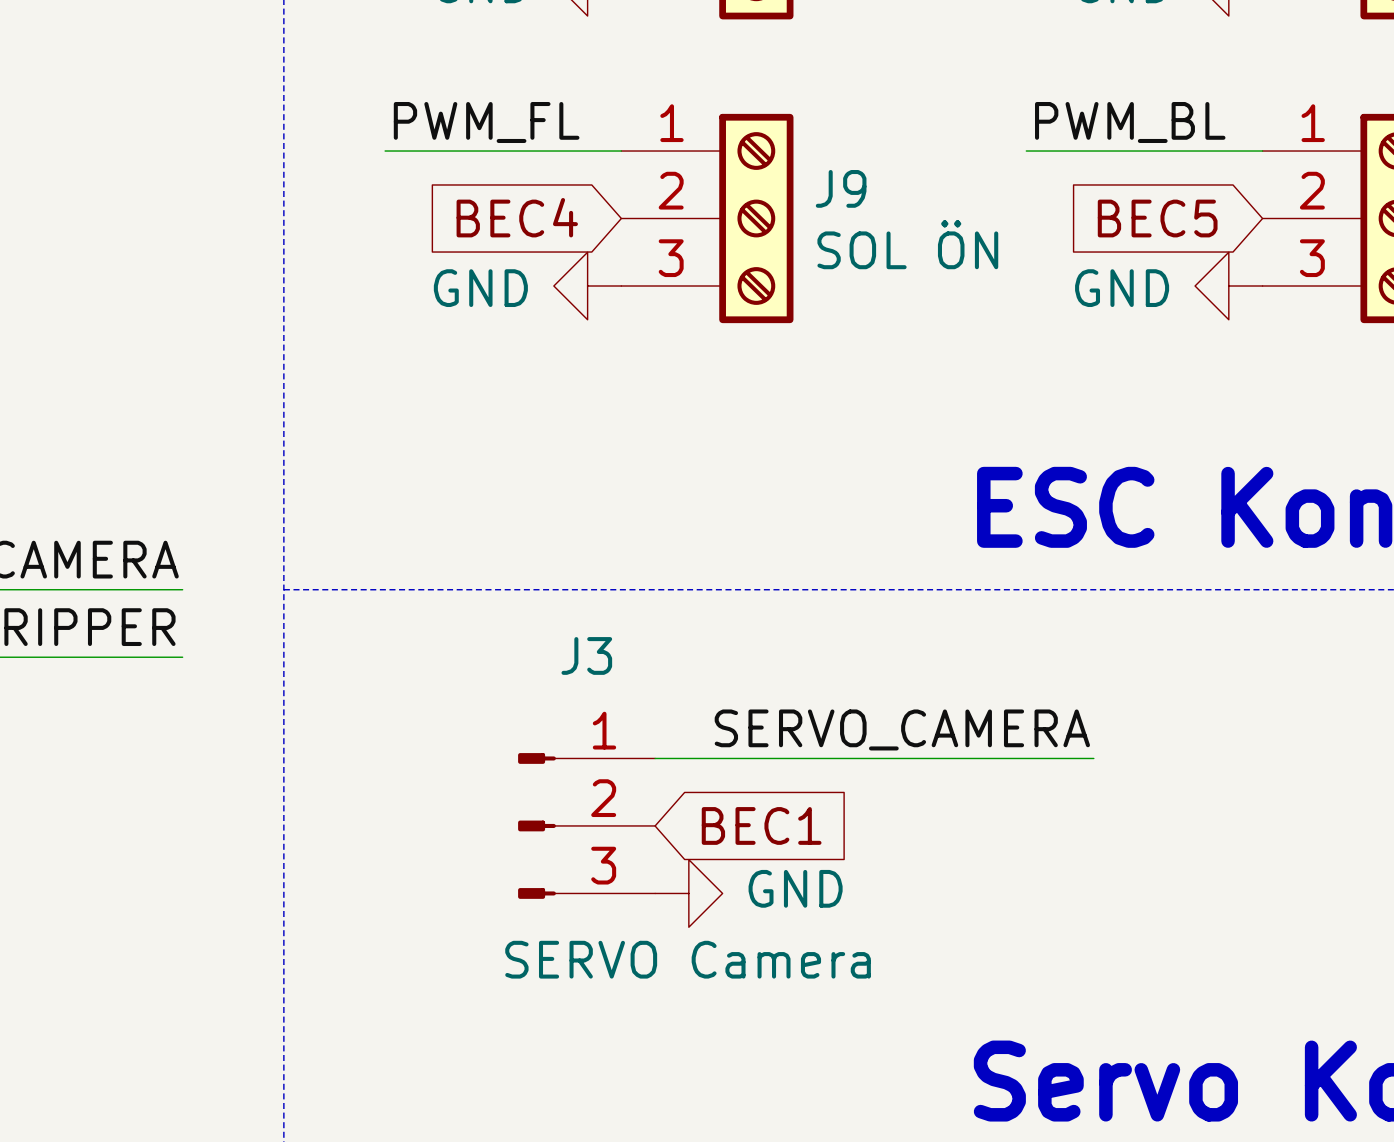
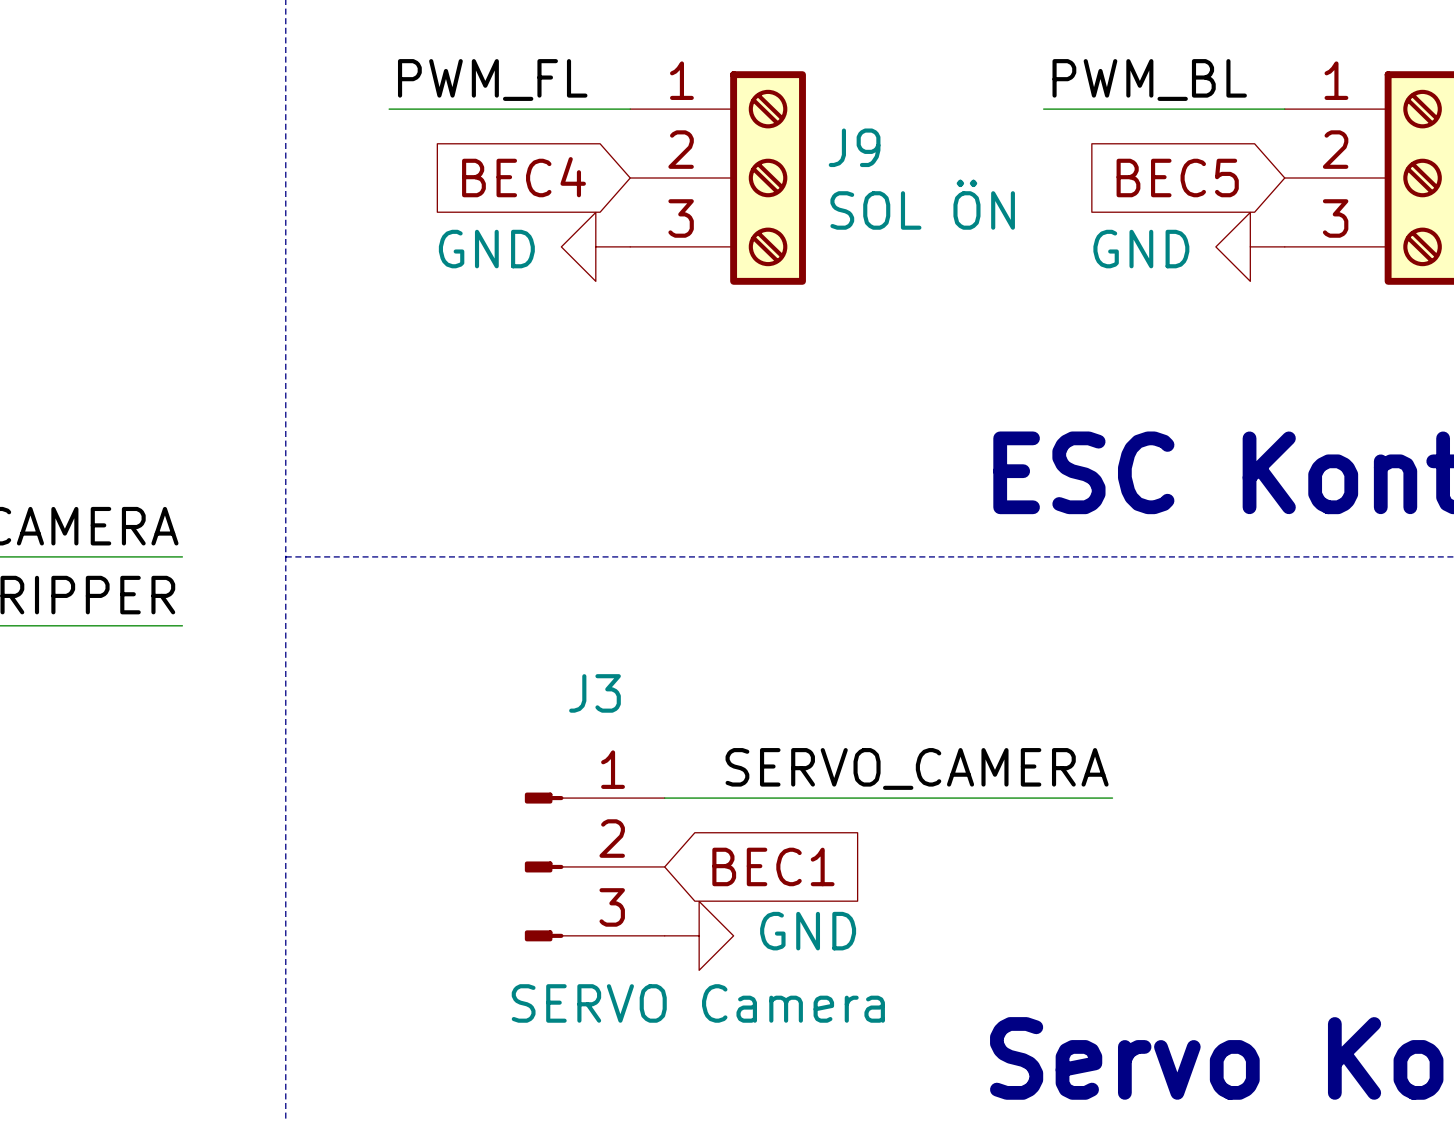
label position: SERVO_CAMERA (902, 729) -> SERVO_CAMERA (917, 768)
wire: (655, 758) (1093, 758) -> (664, 798) (1112, 798)
J3 position: (586, 825) -> (594, 866)
global label position: BEC1 (761, 825) -> BEC1 (773, 866)
power symbol position: GND (688, 893) -> GND (699, 935)

